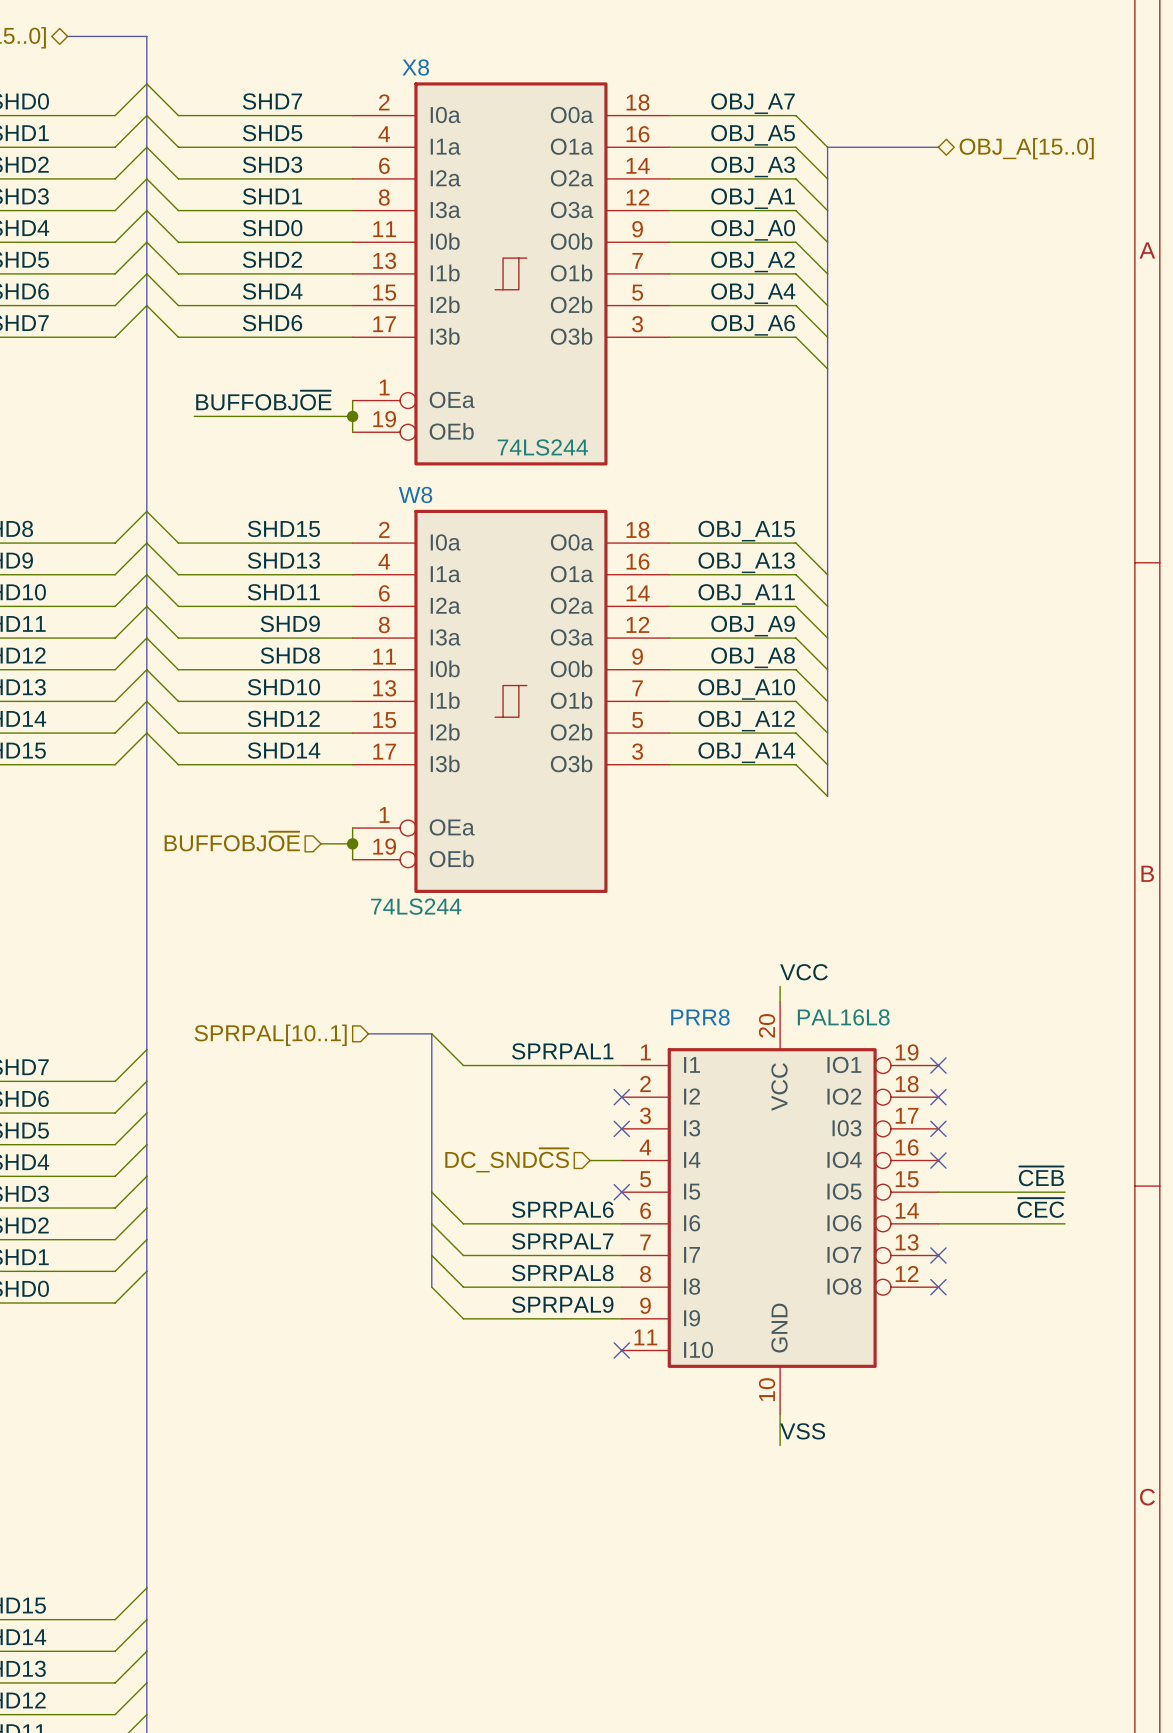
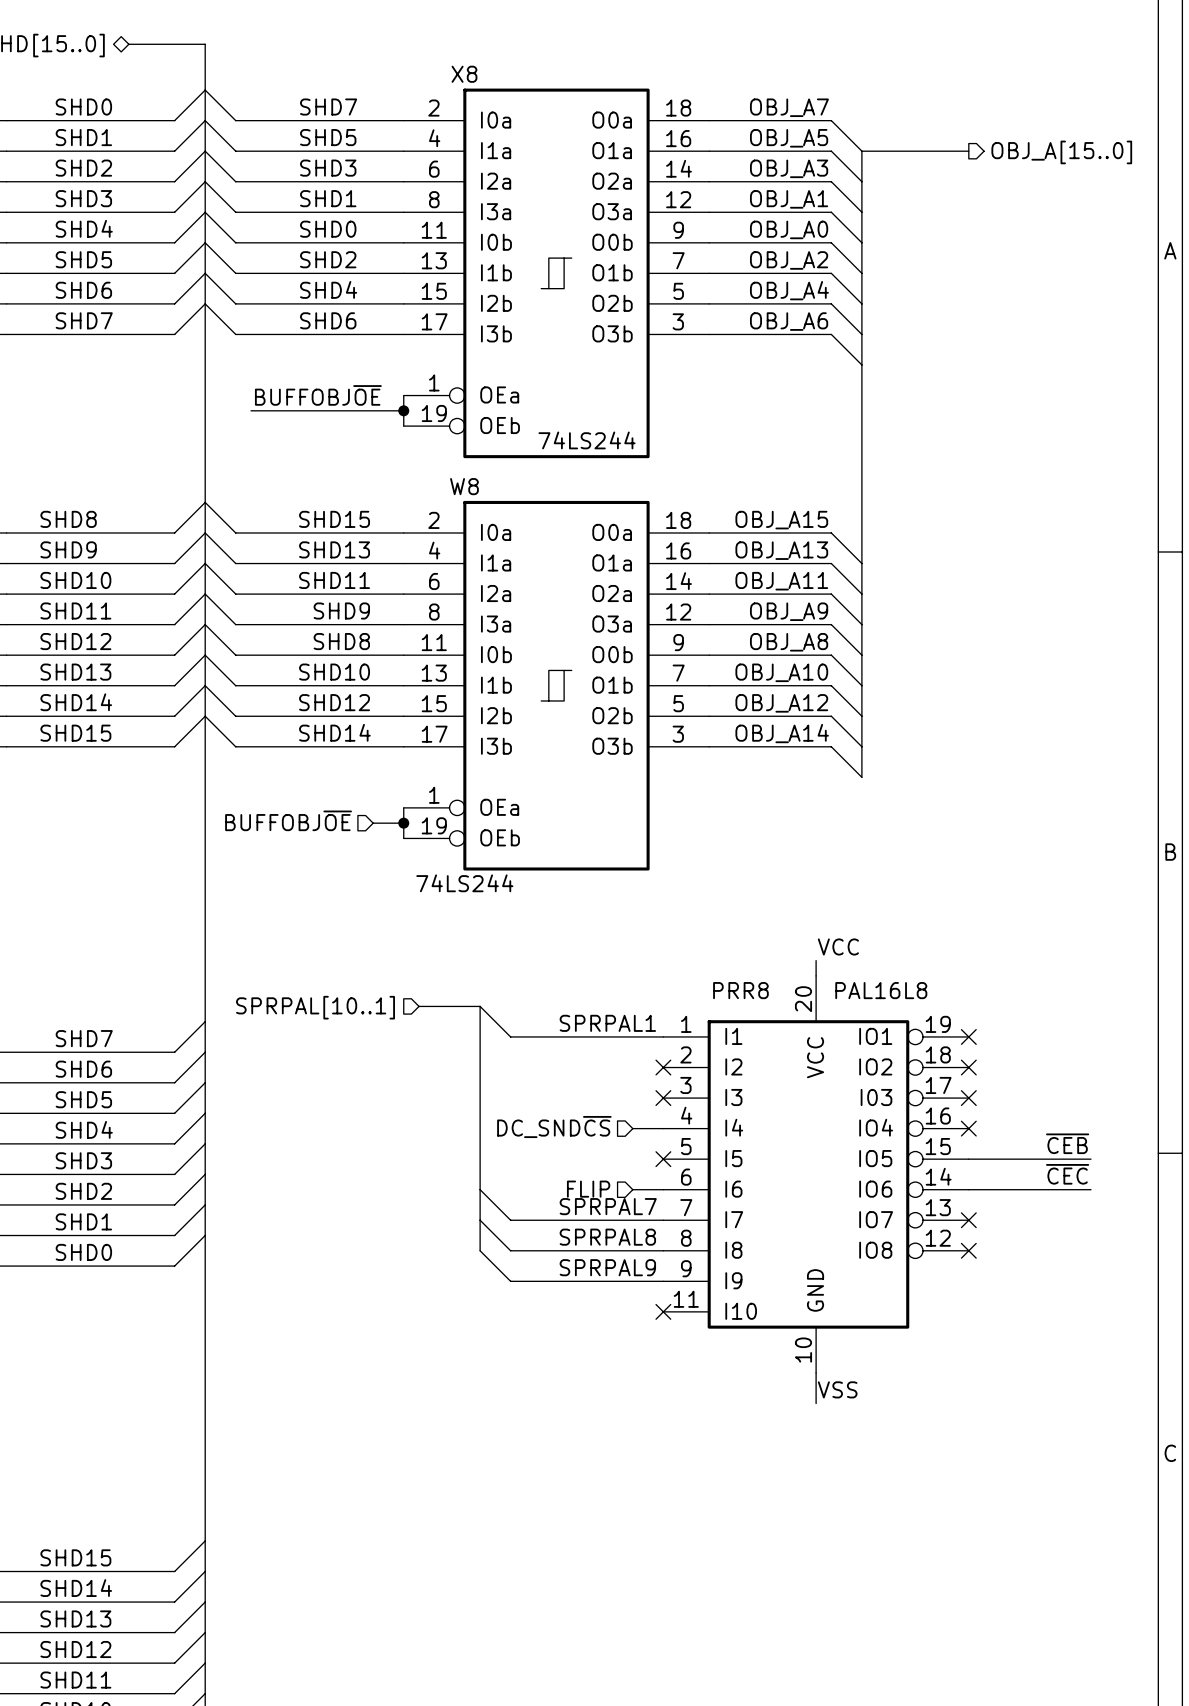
hierarchical label shape: bidirectional (1026, 148) -> output (1061, 152)
wire: (431, 1192) (463, 1223) (590, 1223) -> none
label: SPRPAL6 (562, 1209) -> none
hierarchical label: none -> FLIP (588, 1189)

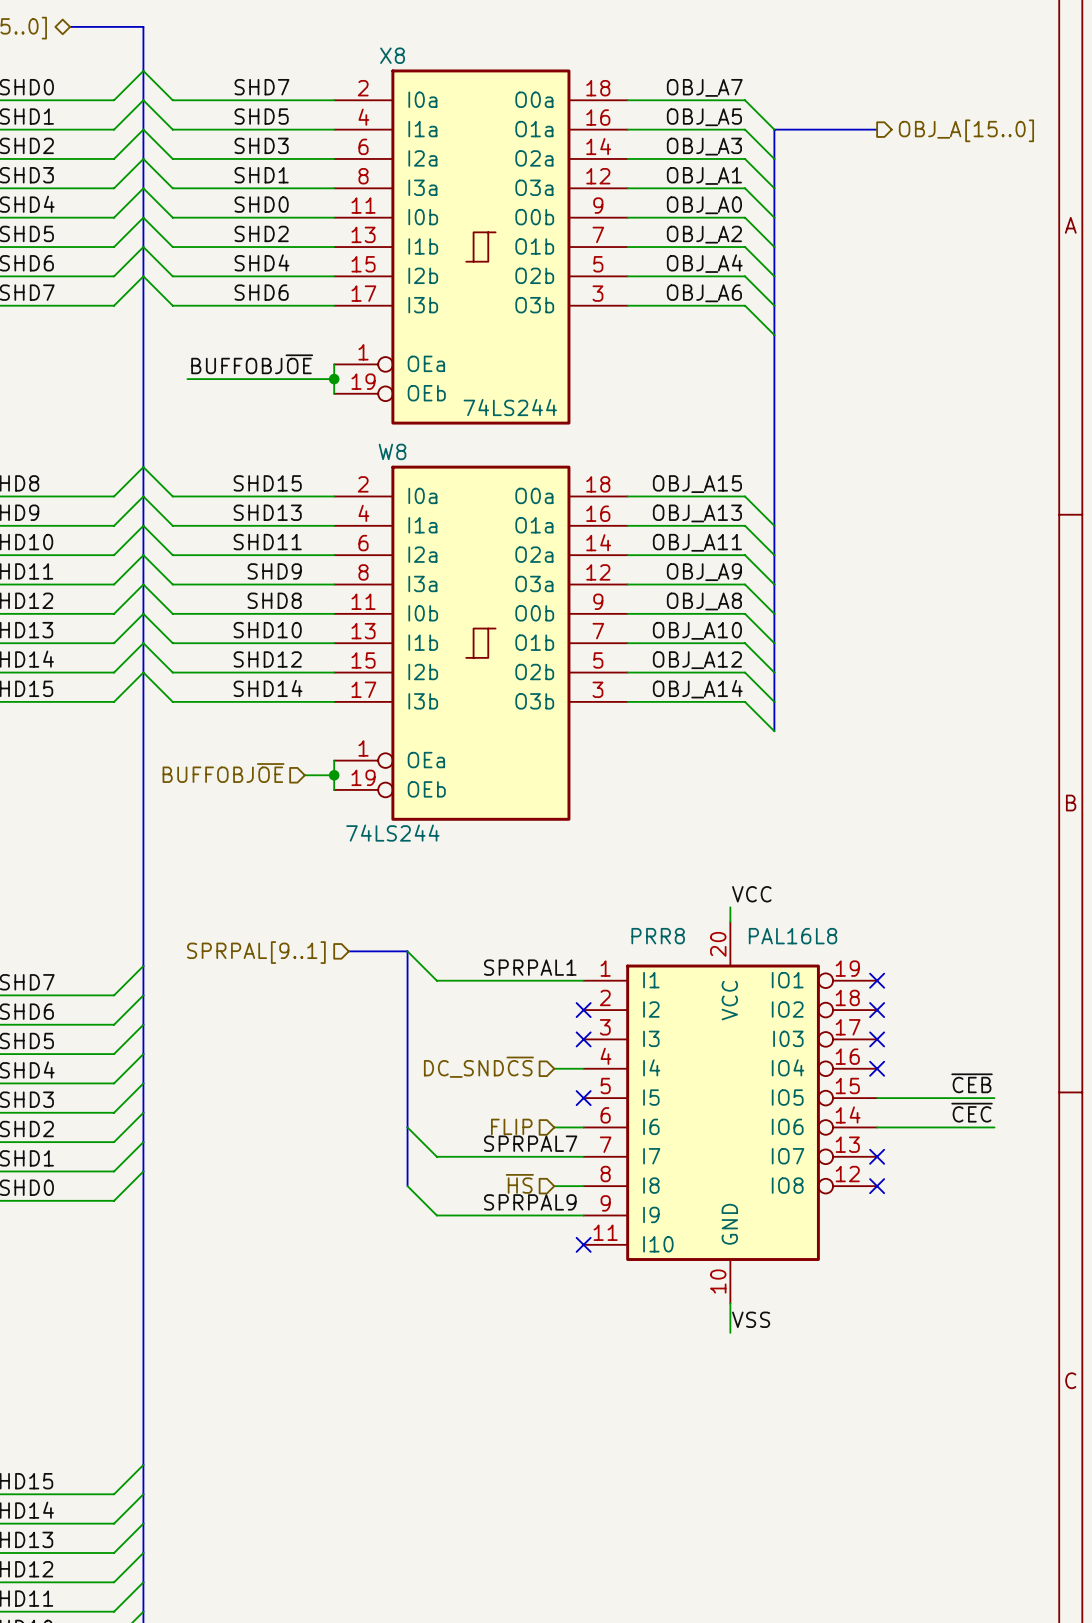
hierarchical label: SPRPAL[10..1] (315, 1007) -> SPRPAL[9..1] (256, 952)
wire: (480, 1220) (510, 1250) (632, 1250) -> none
label: SPRPAL8 (607, 1237) -> none
hierarchical label: none -> ~{HS} (519, 1183)

